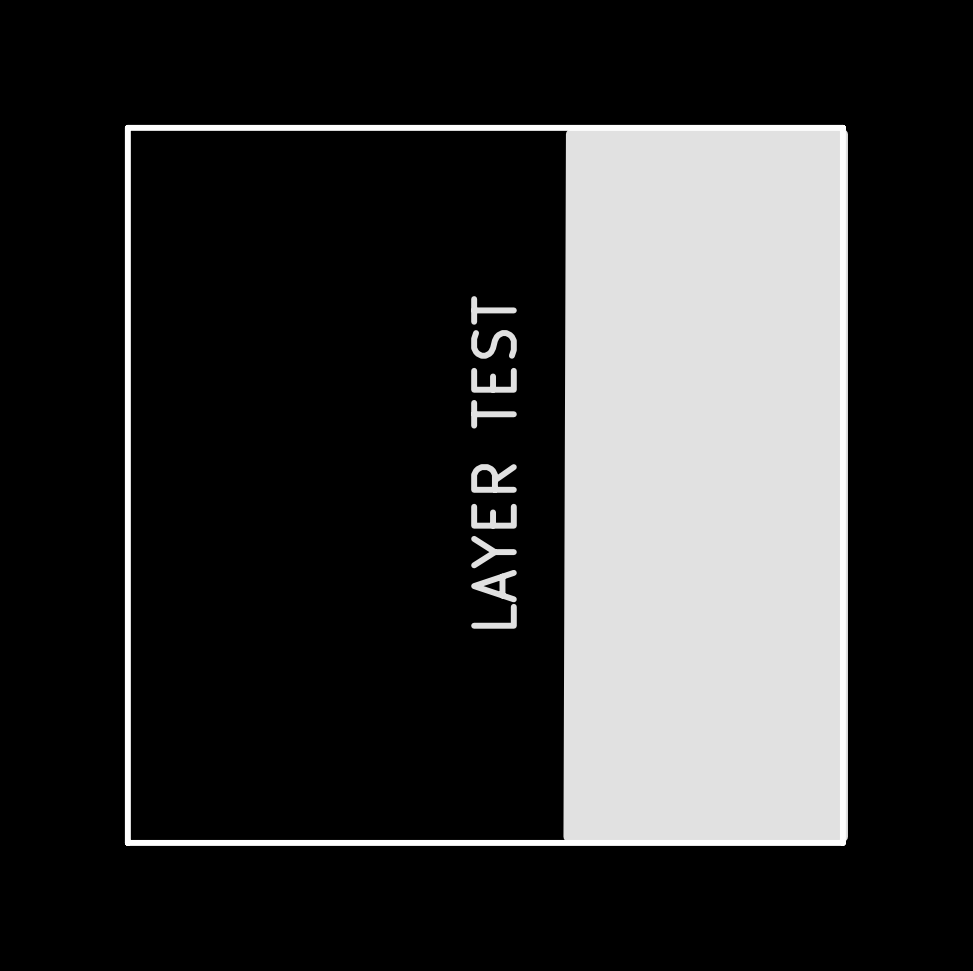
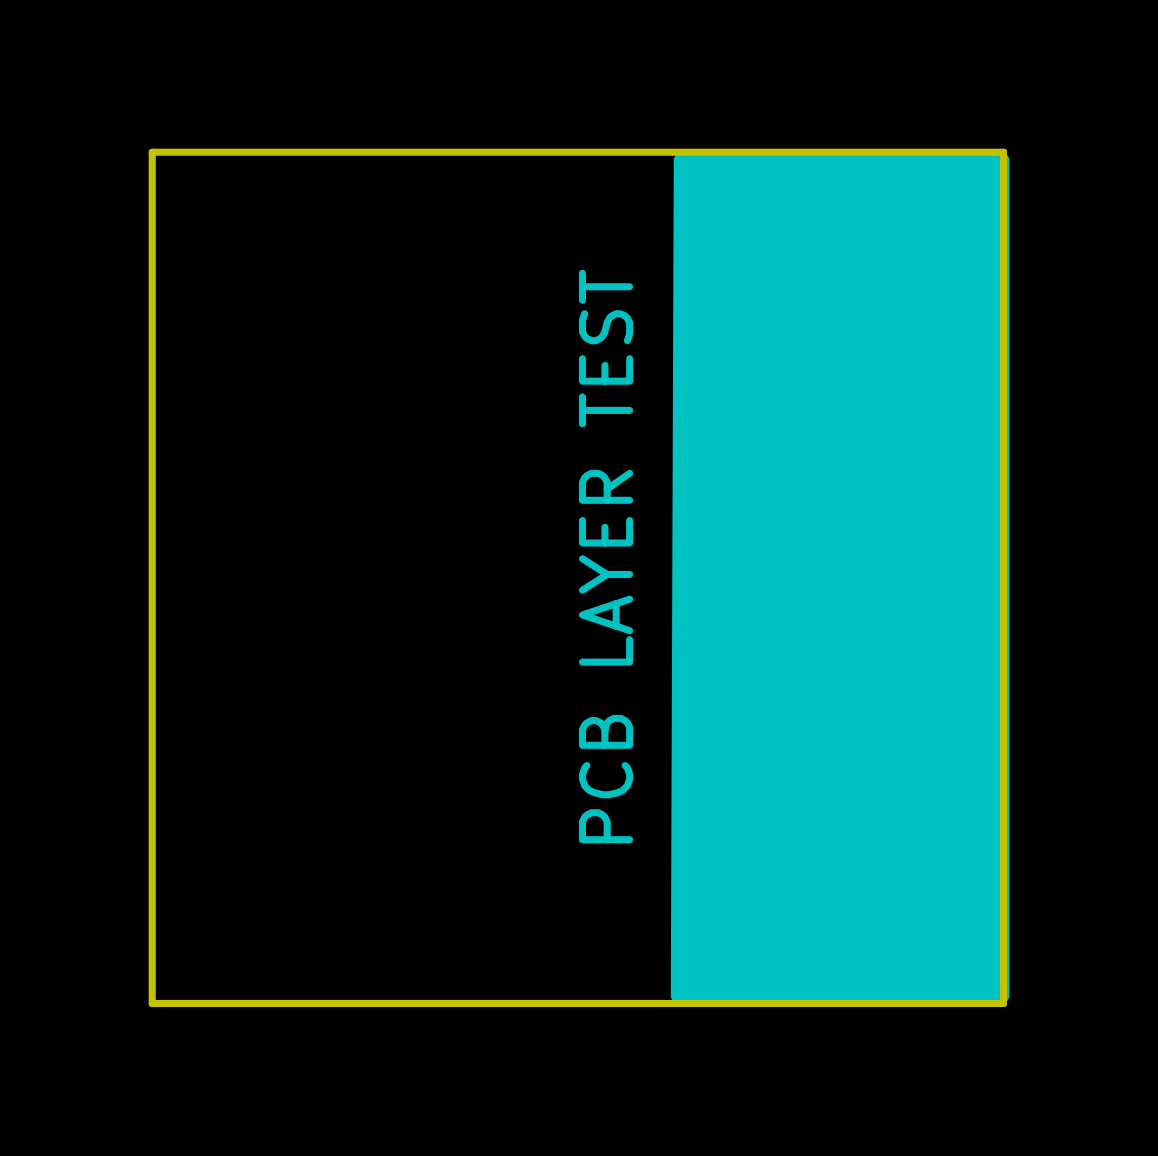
text: LAYER TEST (493, 462) -> PCB LAYER TEST (606, 556)

